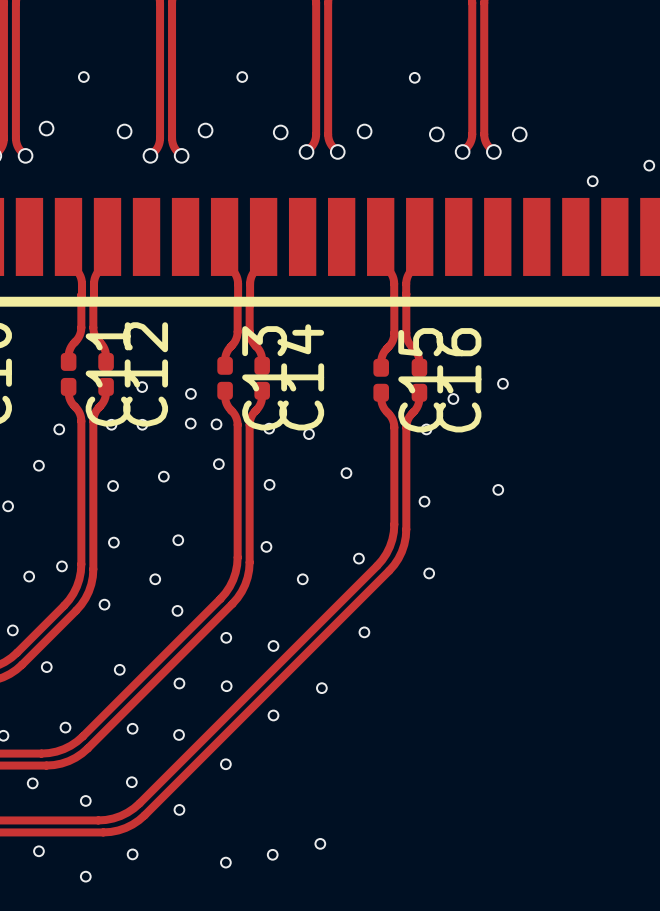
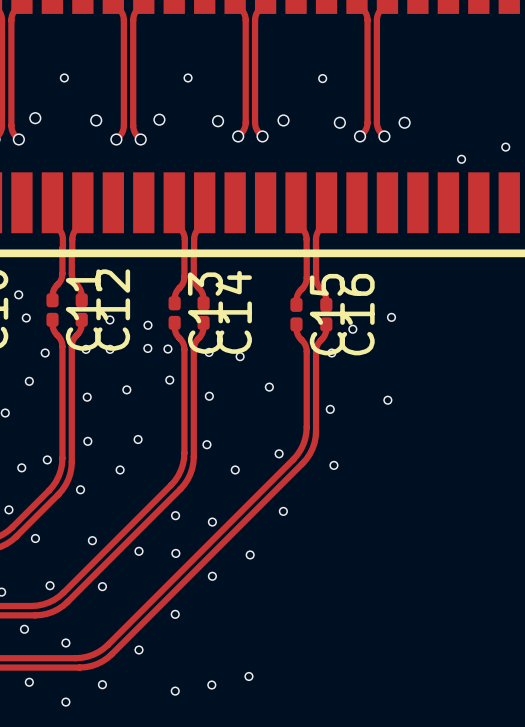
via: none -> (18, 294)
via: none -> (26, 317)
via: (177, 610) -> none
via: (179, 734) -> none
via: (131, 782) -> none

